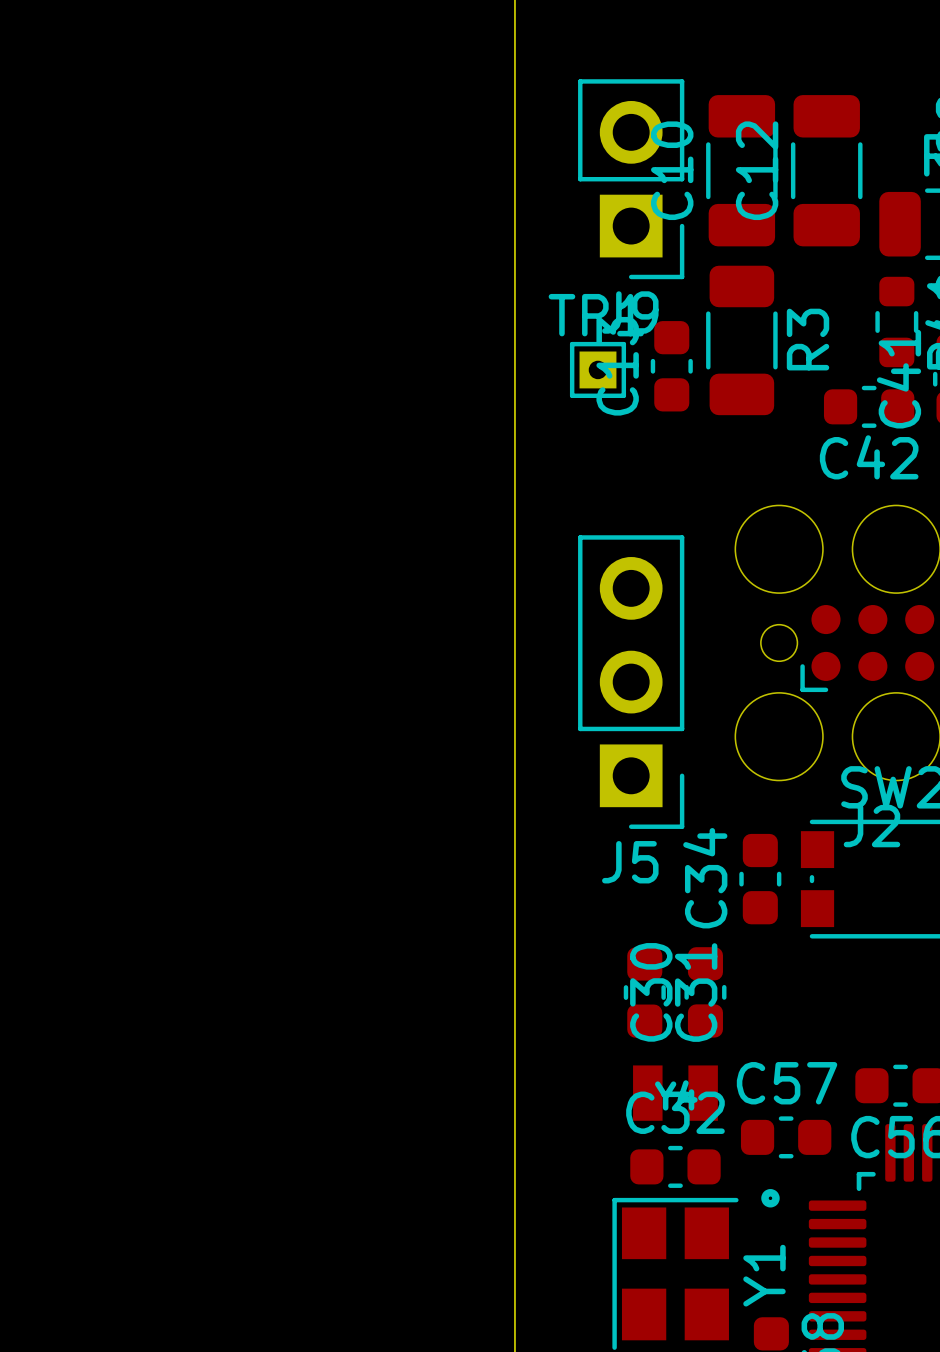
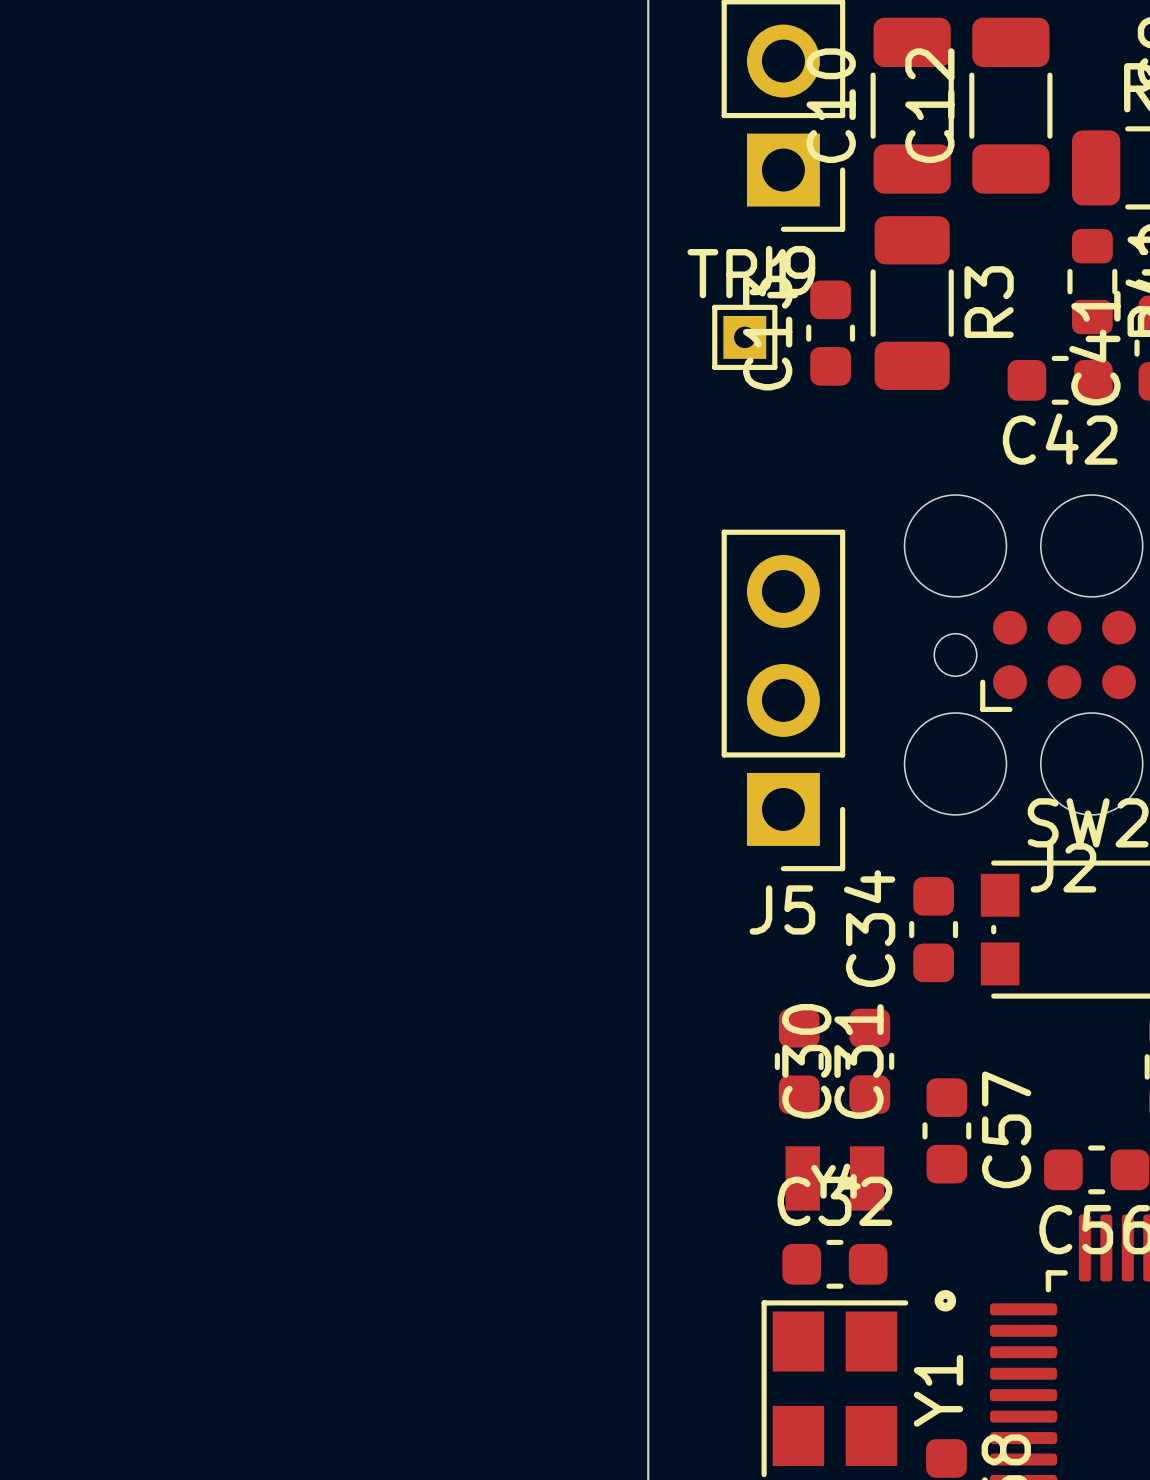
C57 rotation: 0° (786, 1137) -> 90° clockwise (946, 1130)
C57 position: (786, 1137) -> (946, 1130)

